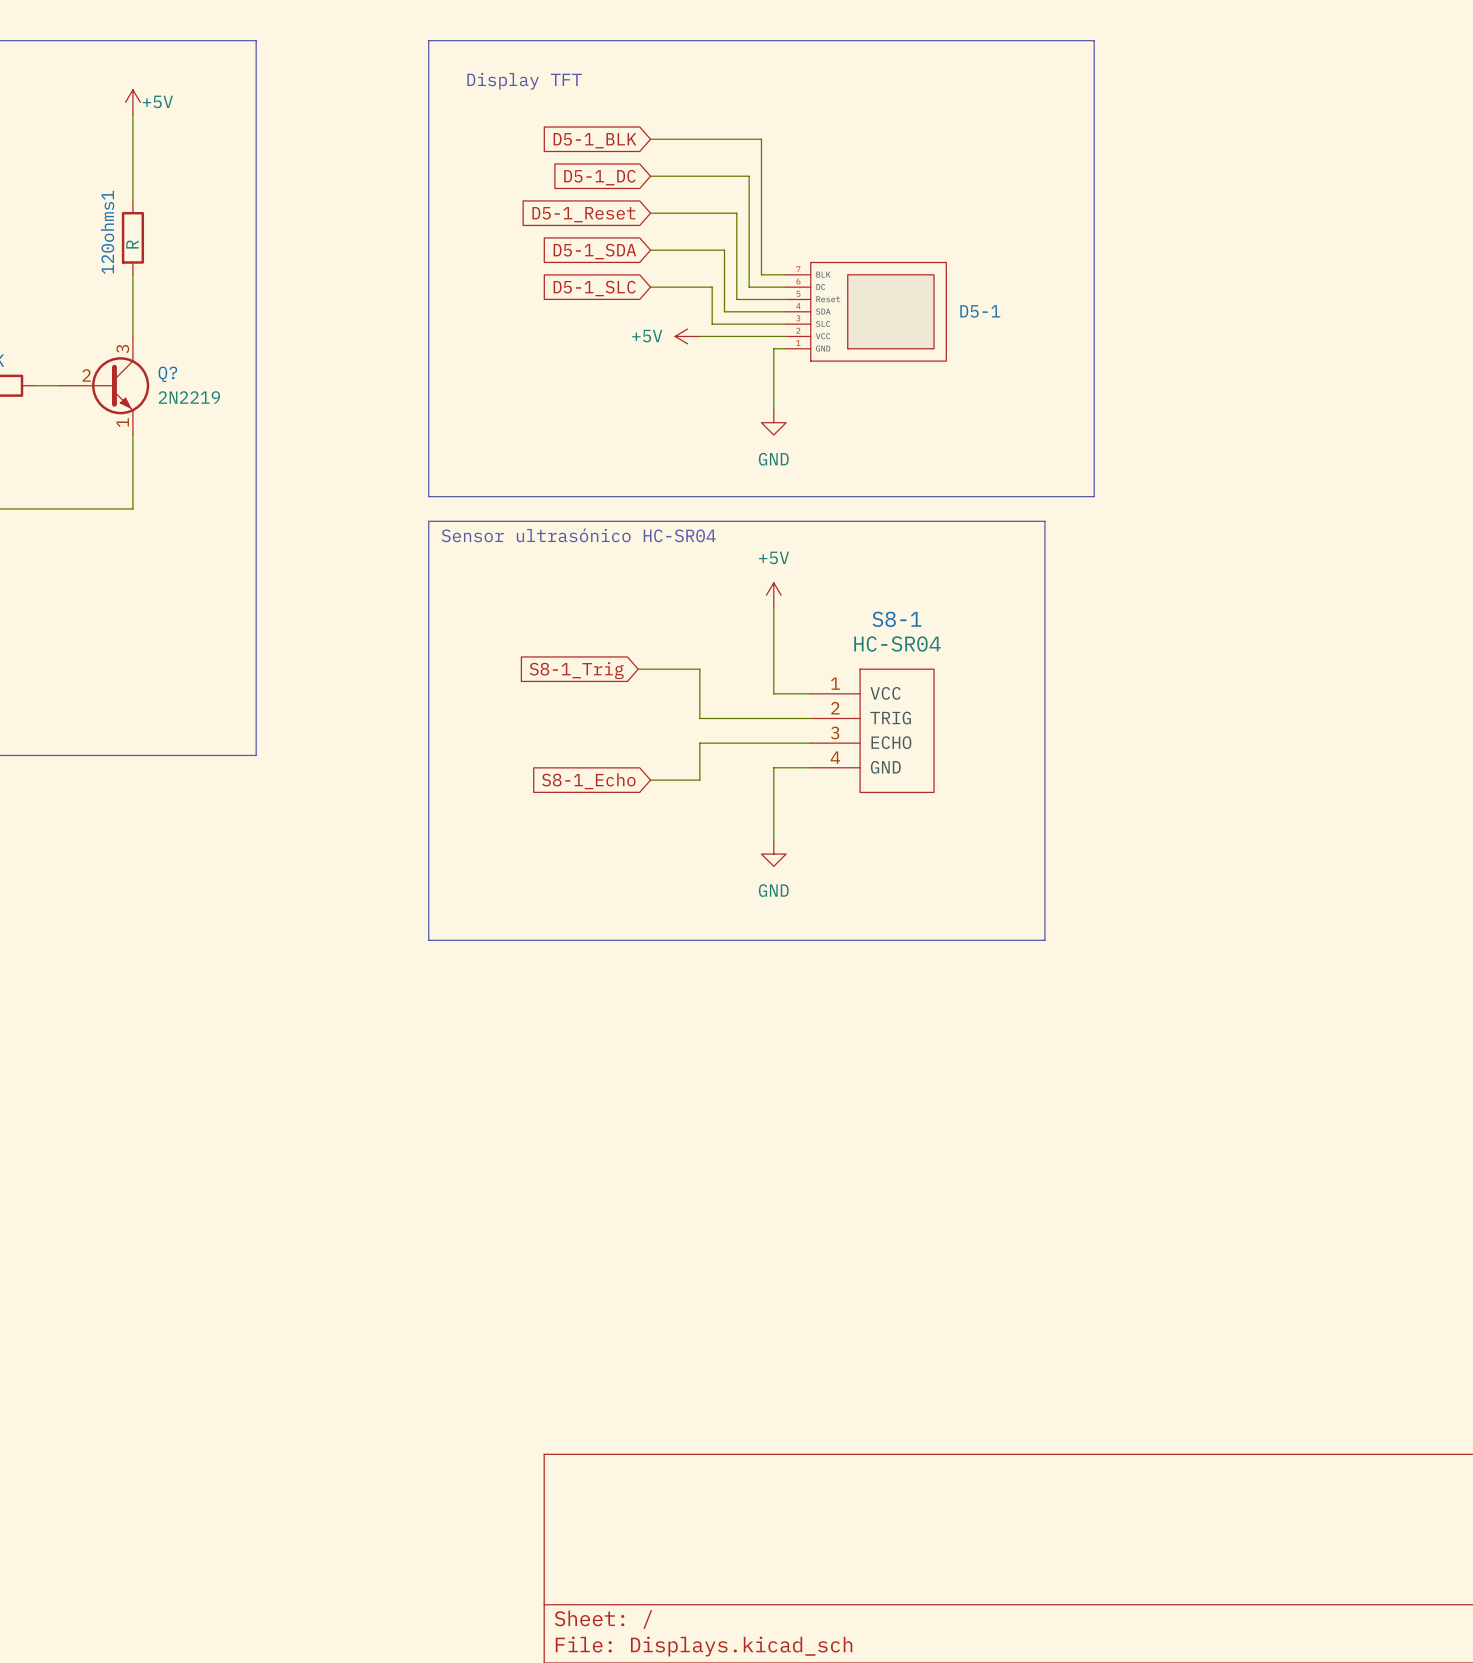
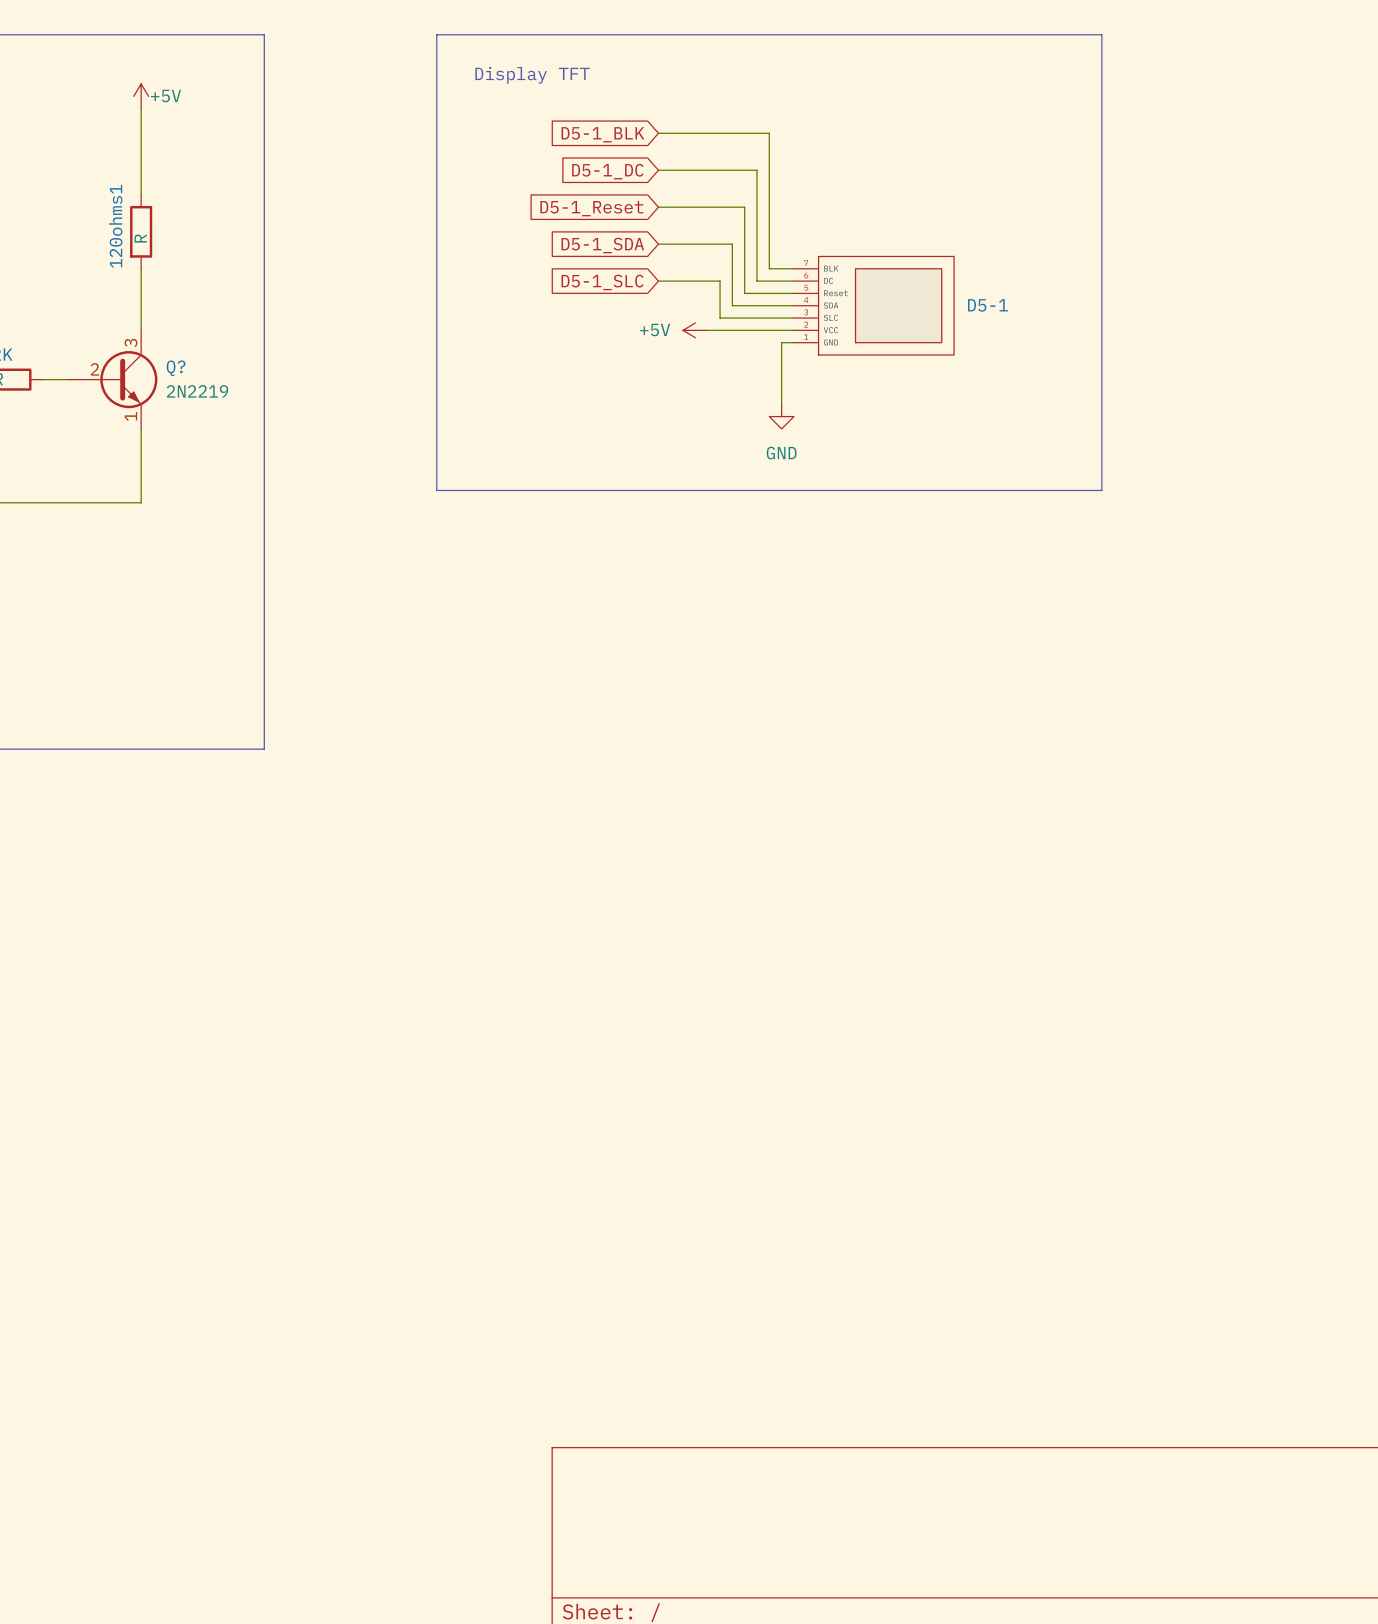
line: (428, 521) (1044, 521) (1044, 940) (428, 940) (428, 521) -> none
text: Sensor ultrasónico HC-SR04 (578, 535) -> none
power symbol: +5V (773, 595) -> none
wire: (773, 607) (773, 693) (810, 693) -> none
wire: (638, 669) (699, 669) (699, 718) (810, 718) -> none
global label: S8-1_Trig (576, 670) -> none
S8-1: HC-SR04 (872, 730) -> none
wire: (810, 743) (699, 743) (699, 780) (650, 780) -> none
wire: (810, 767) (773, 767) (773, 841) -> none
global label: S8-1_Echo (588, 781) -> none
power symbol: GND (773, 854) -> none

